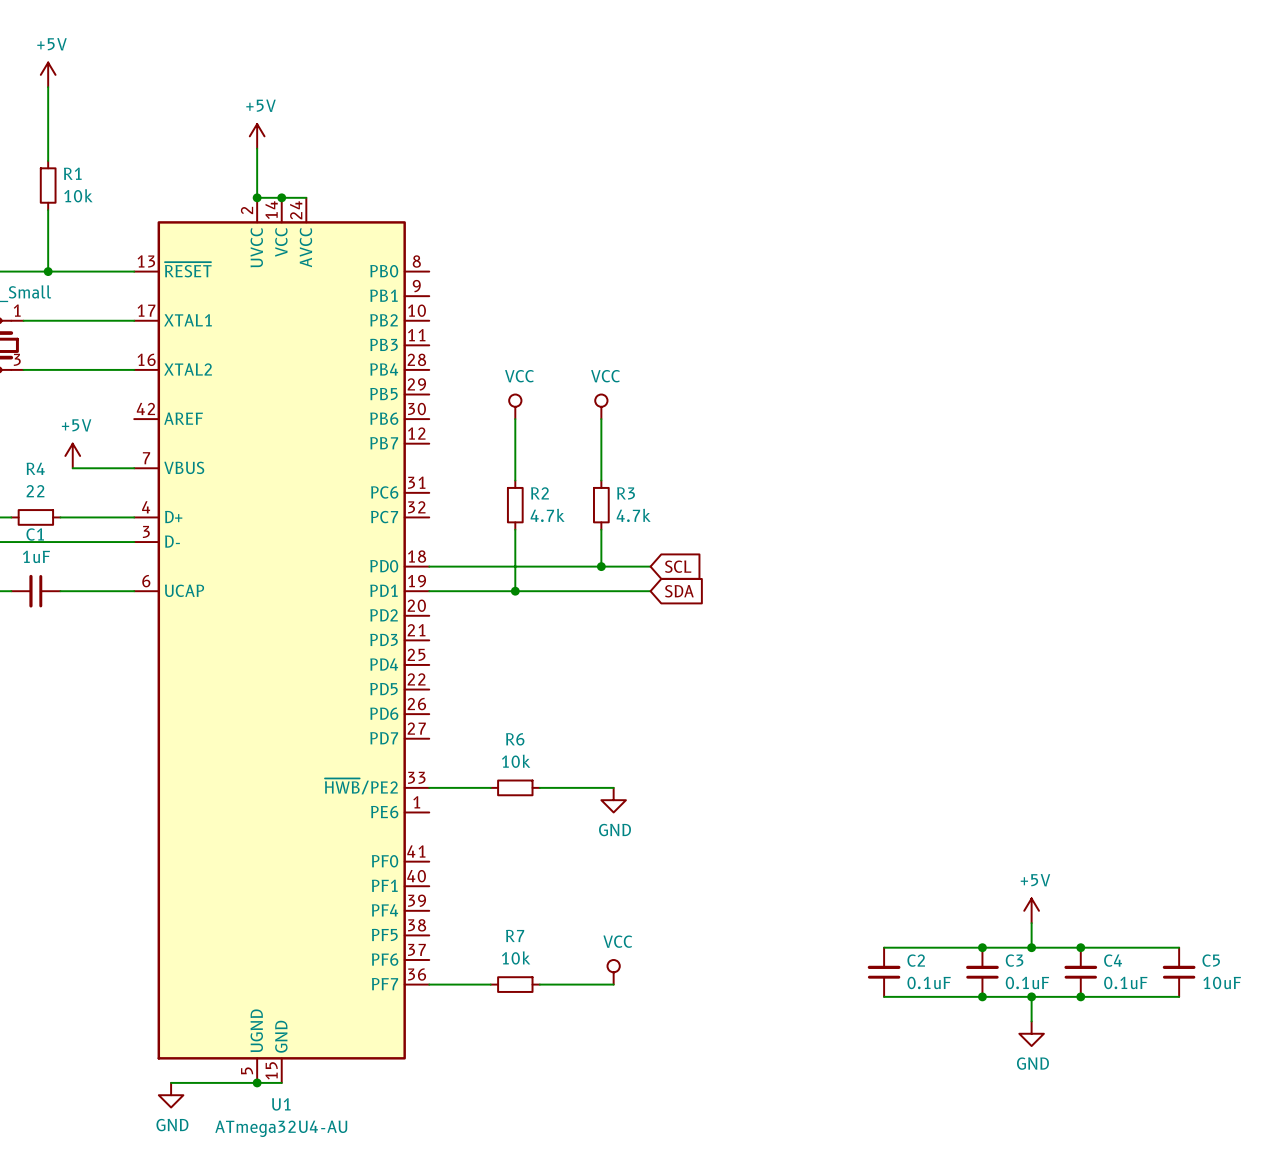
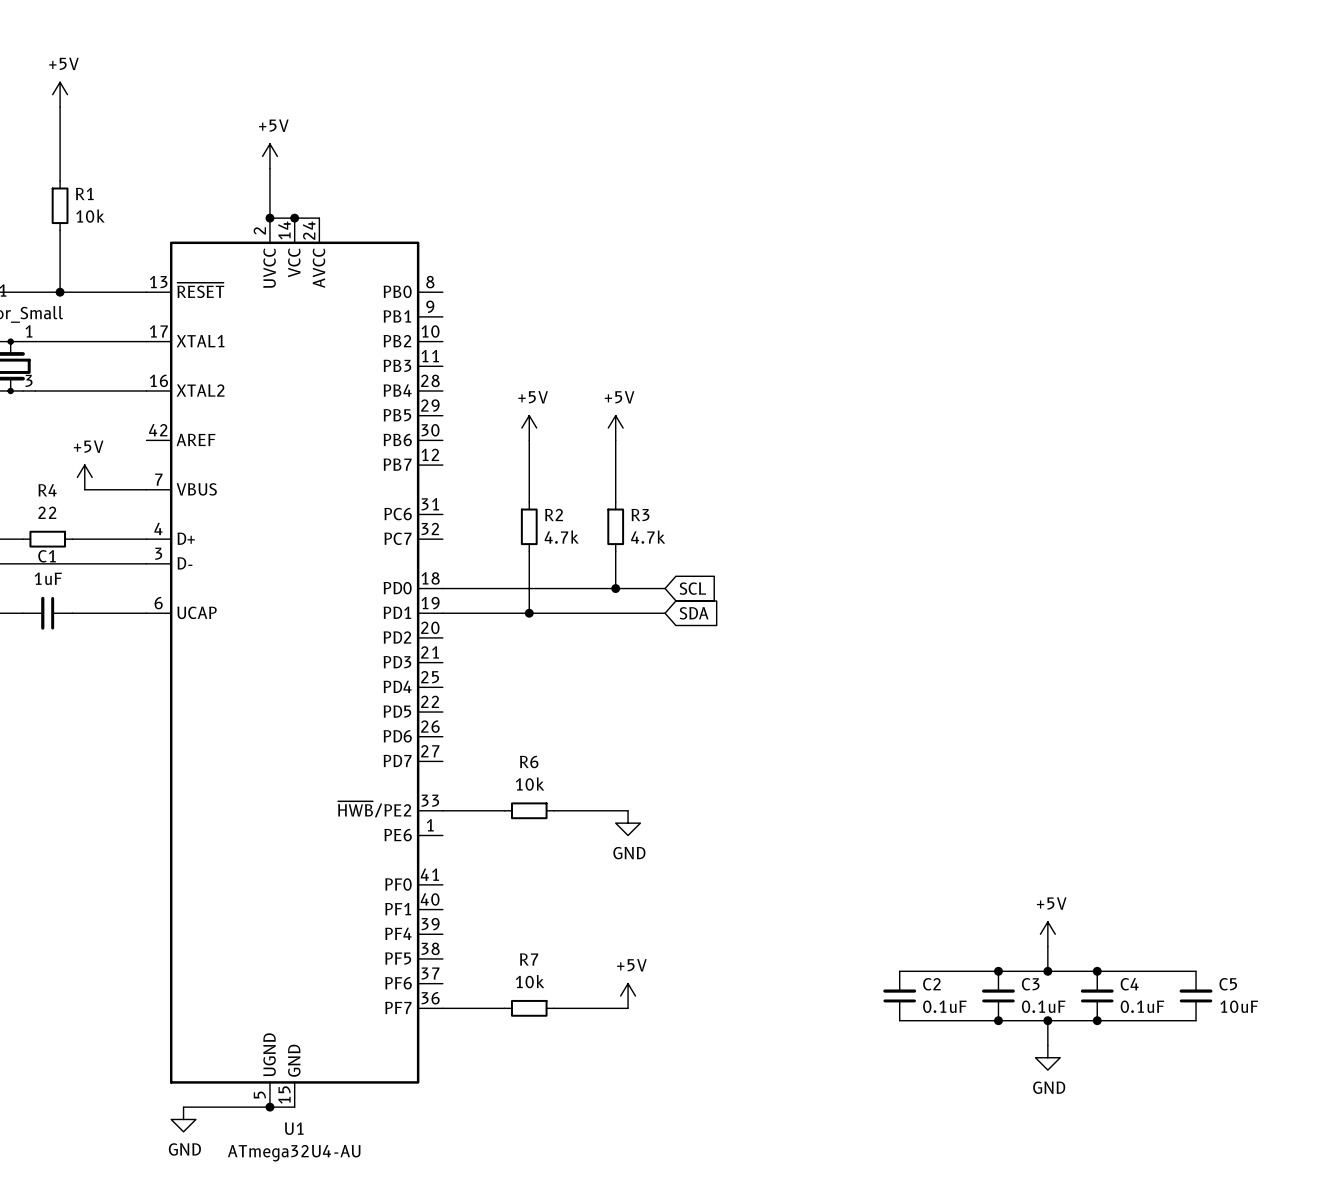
power symbol: VCC (515, 406) -> +5V (529, 428)
power symbol: VCC (601, 406) -> +5V (615, 428)
power symbol: VCC (613, 972) -> +5V (628, 996)

